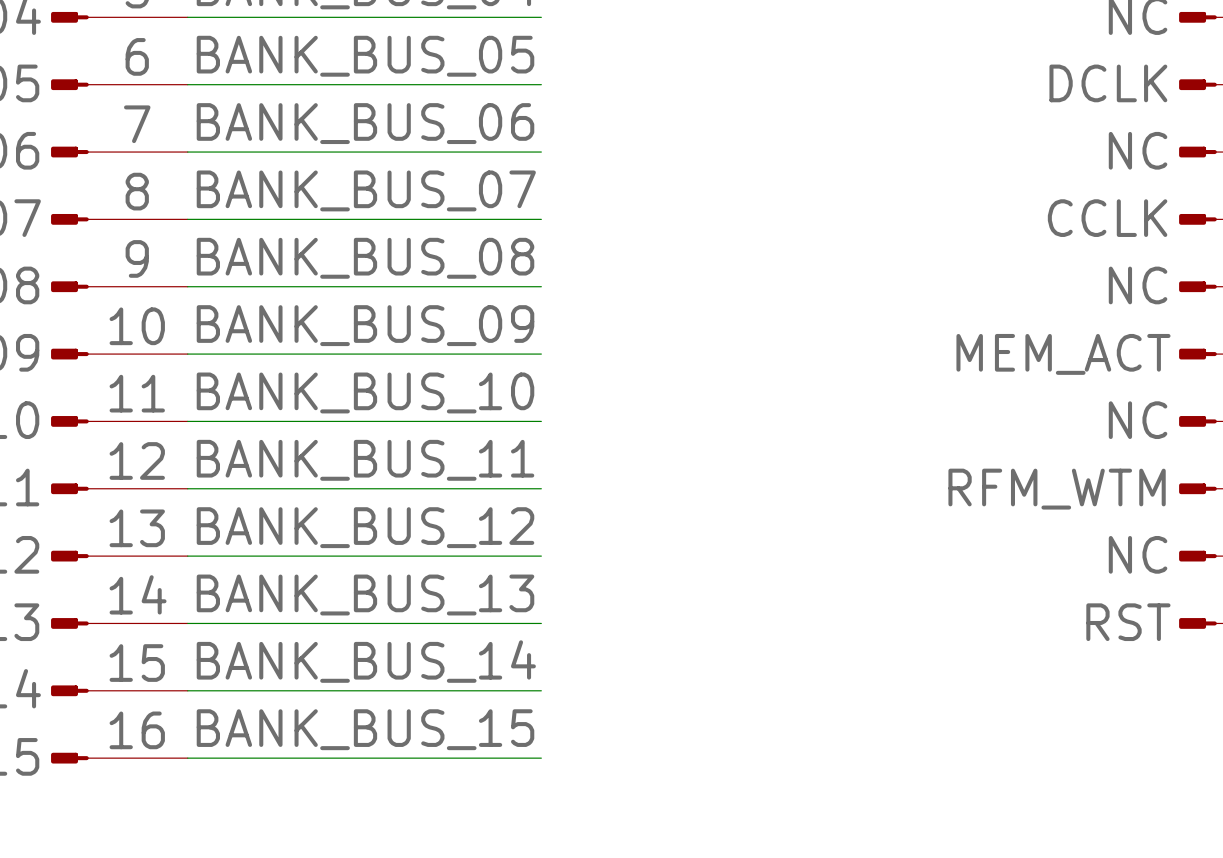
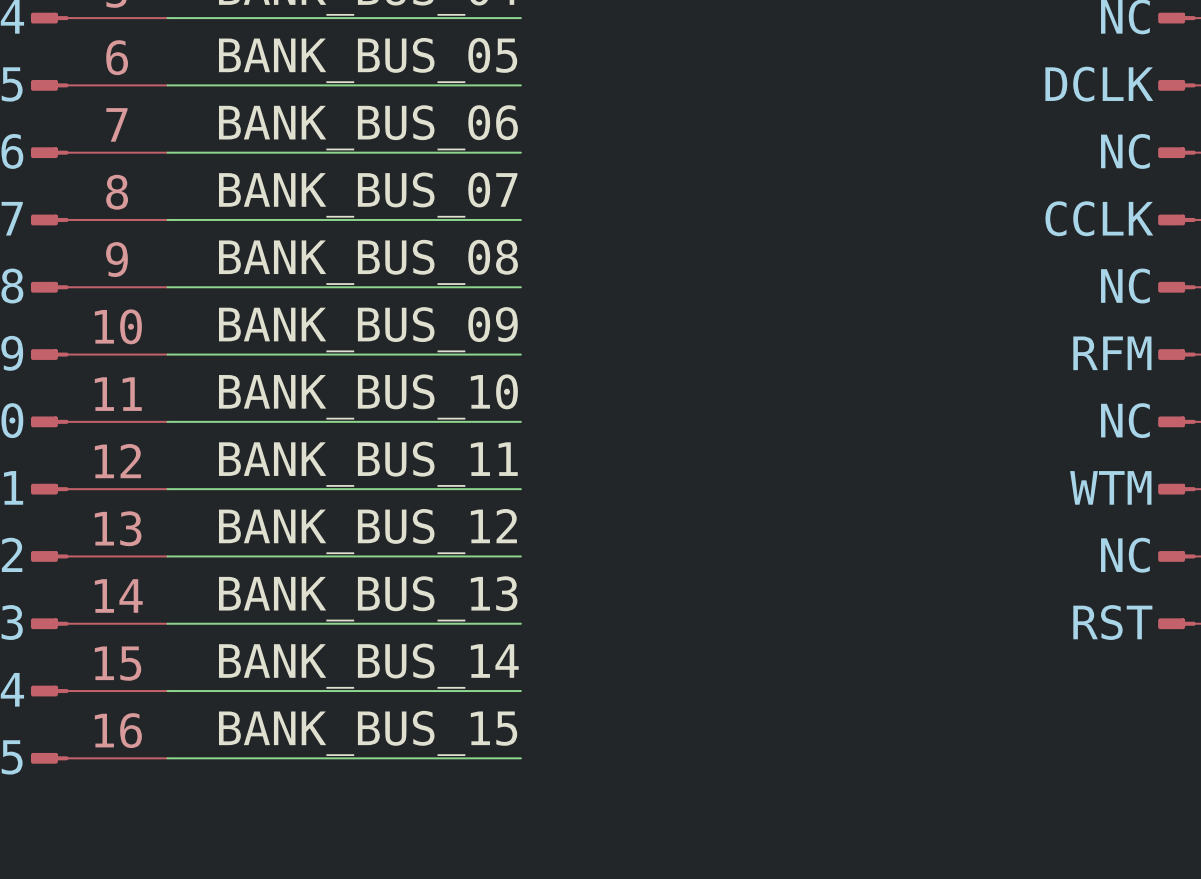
part pin name: MEM_ACT (1063, 354) -> RFM (1112, 353)
part pin name: RFM_WTM (1057, 489) -> WTM (1110, 487)

